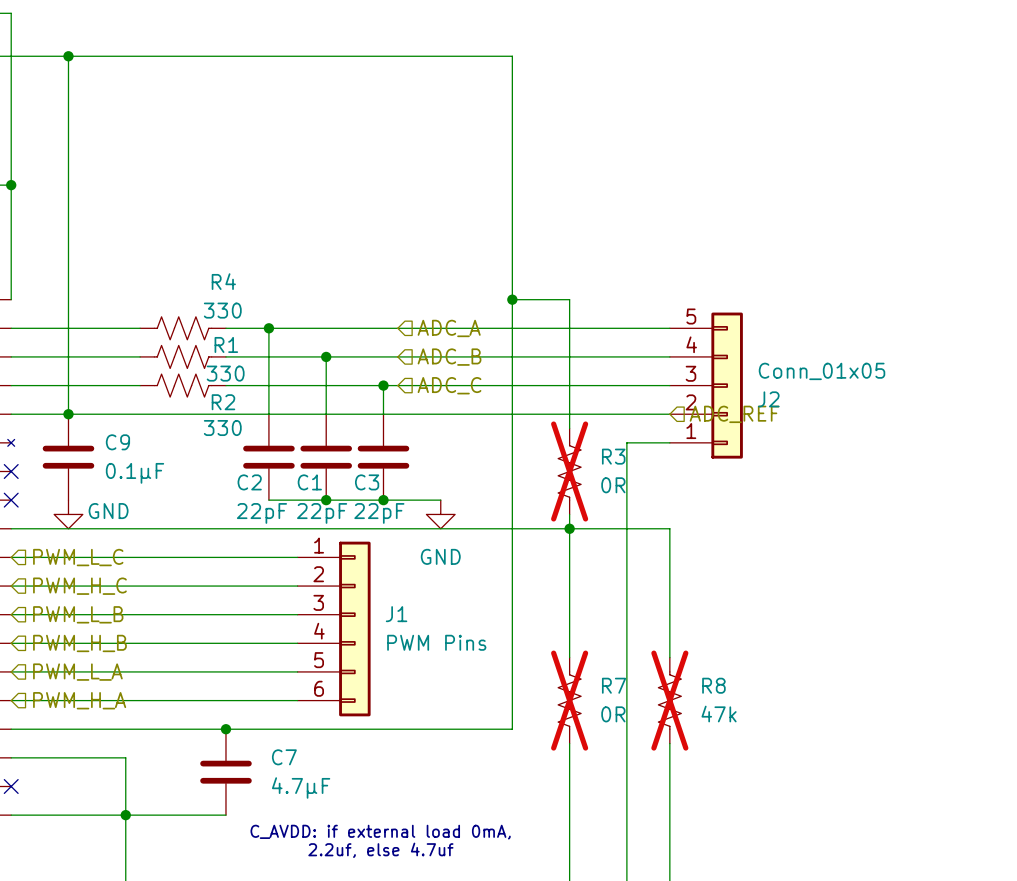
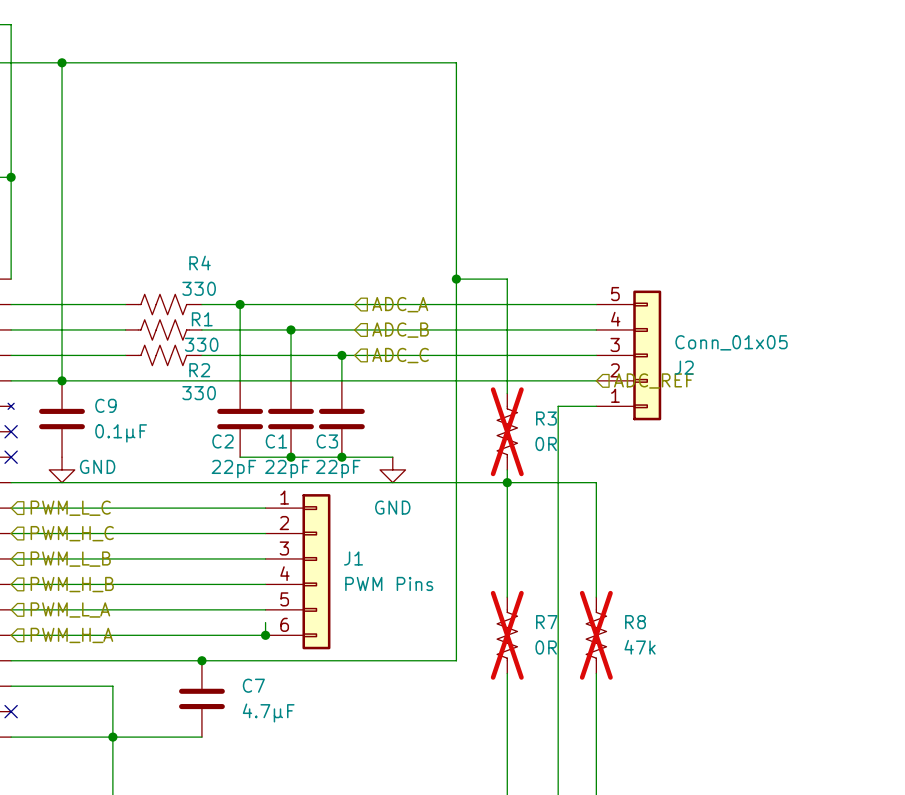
wire: none -> (265, 622) (265, 635)
junction: none -> (265, 635)
text: C_AVDD: if external load 0mA, (380, 832) -> none
text: 2.2uf, else 4.7uf (380, 850) -> none

